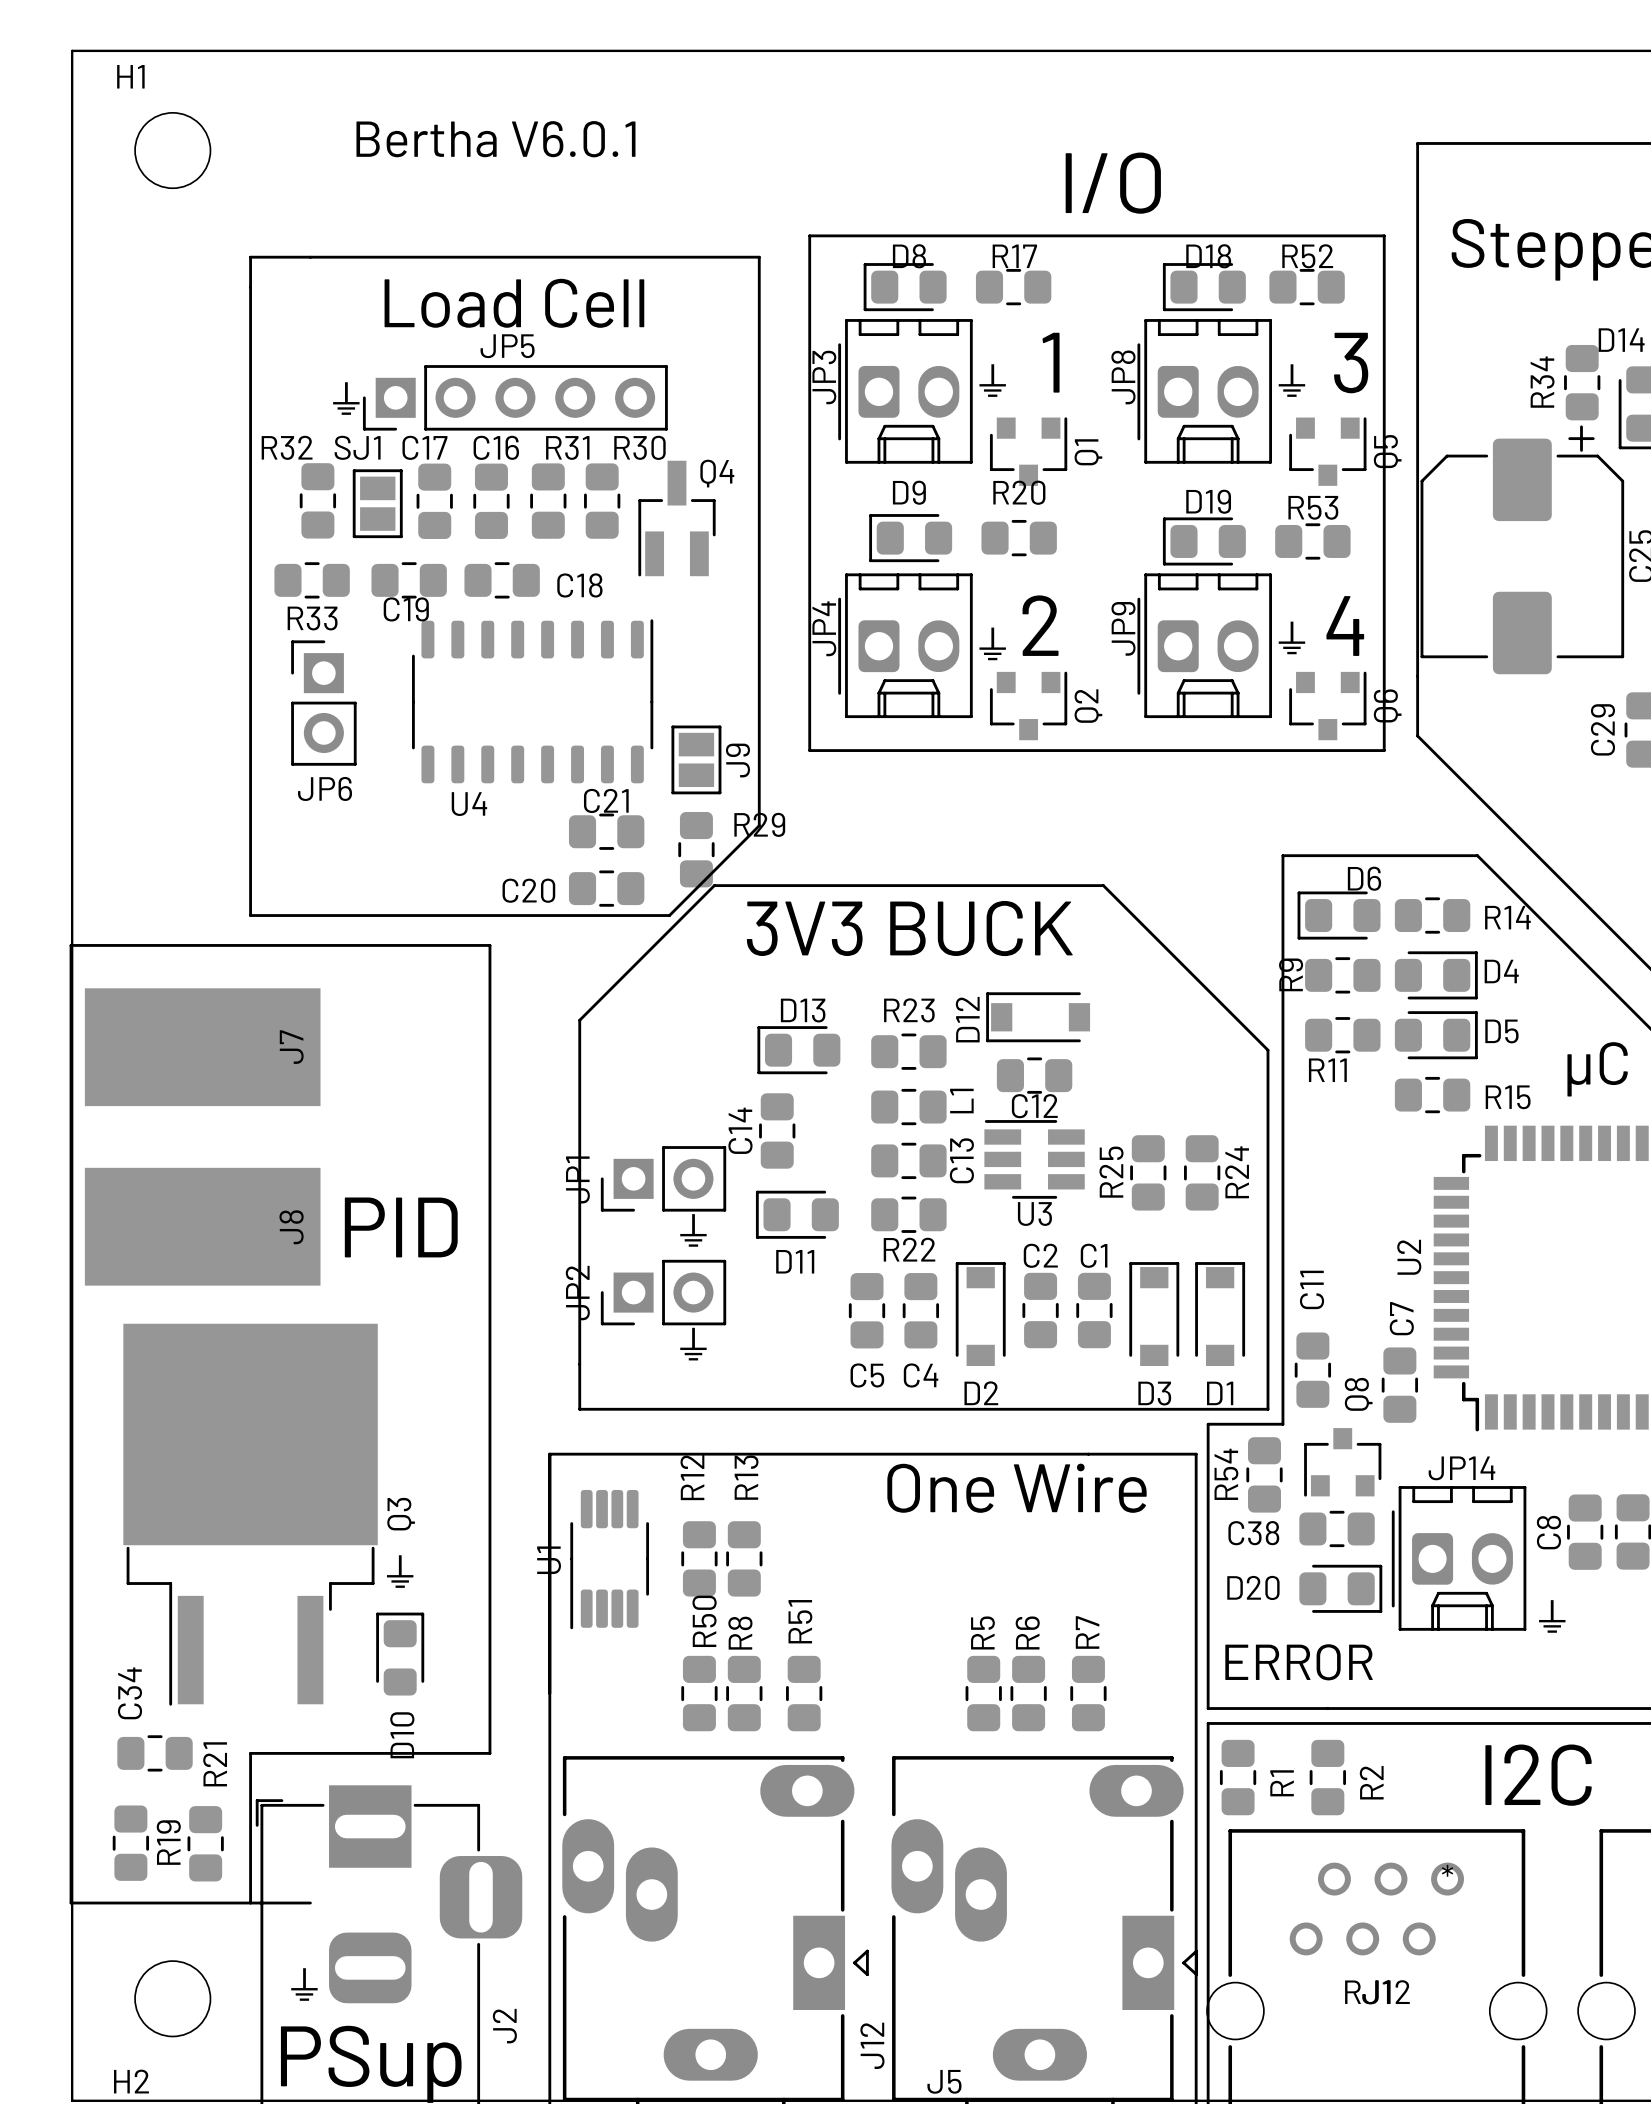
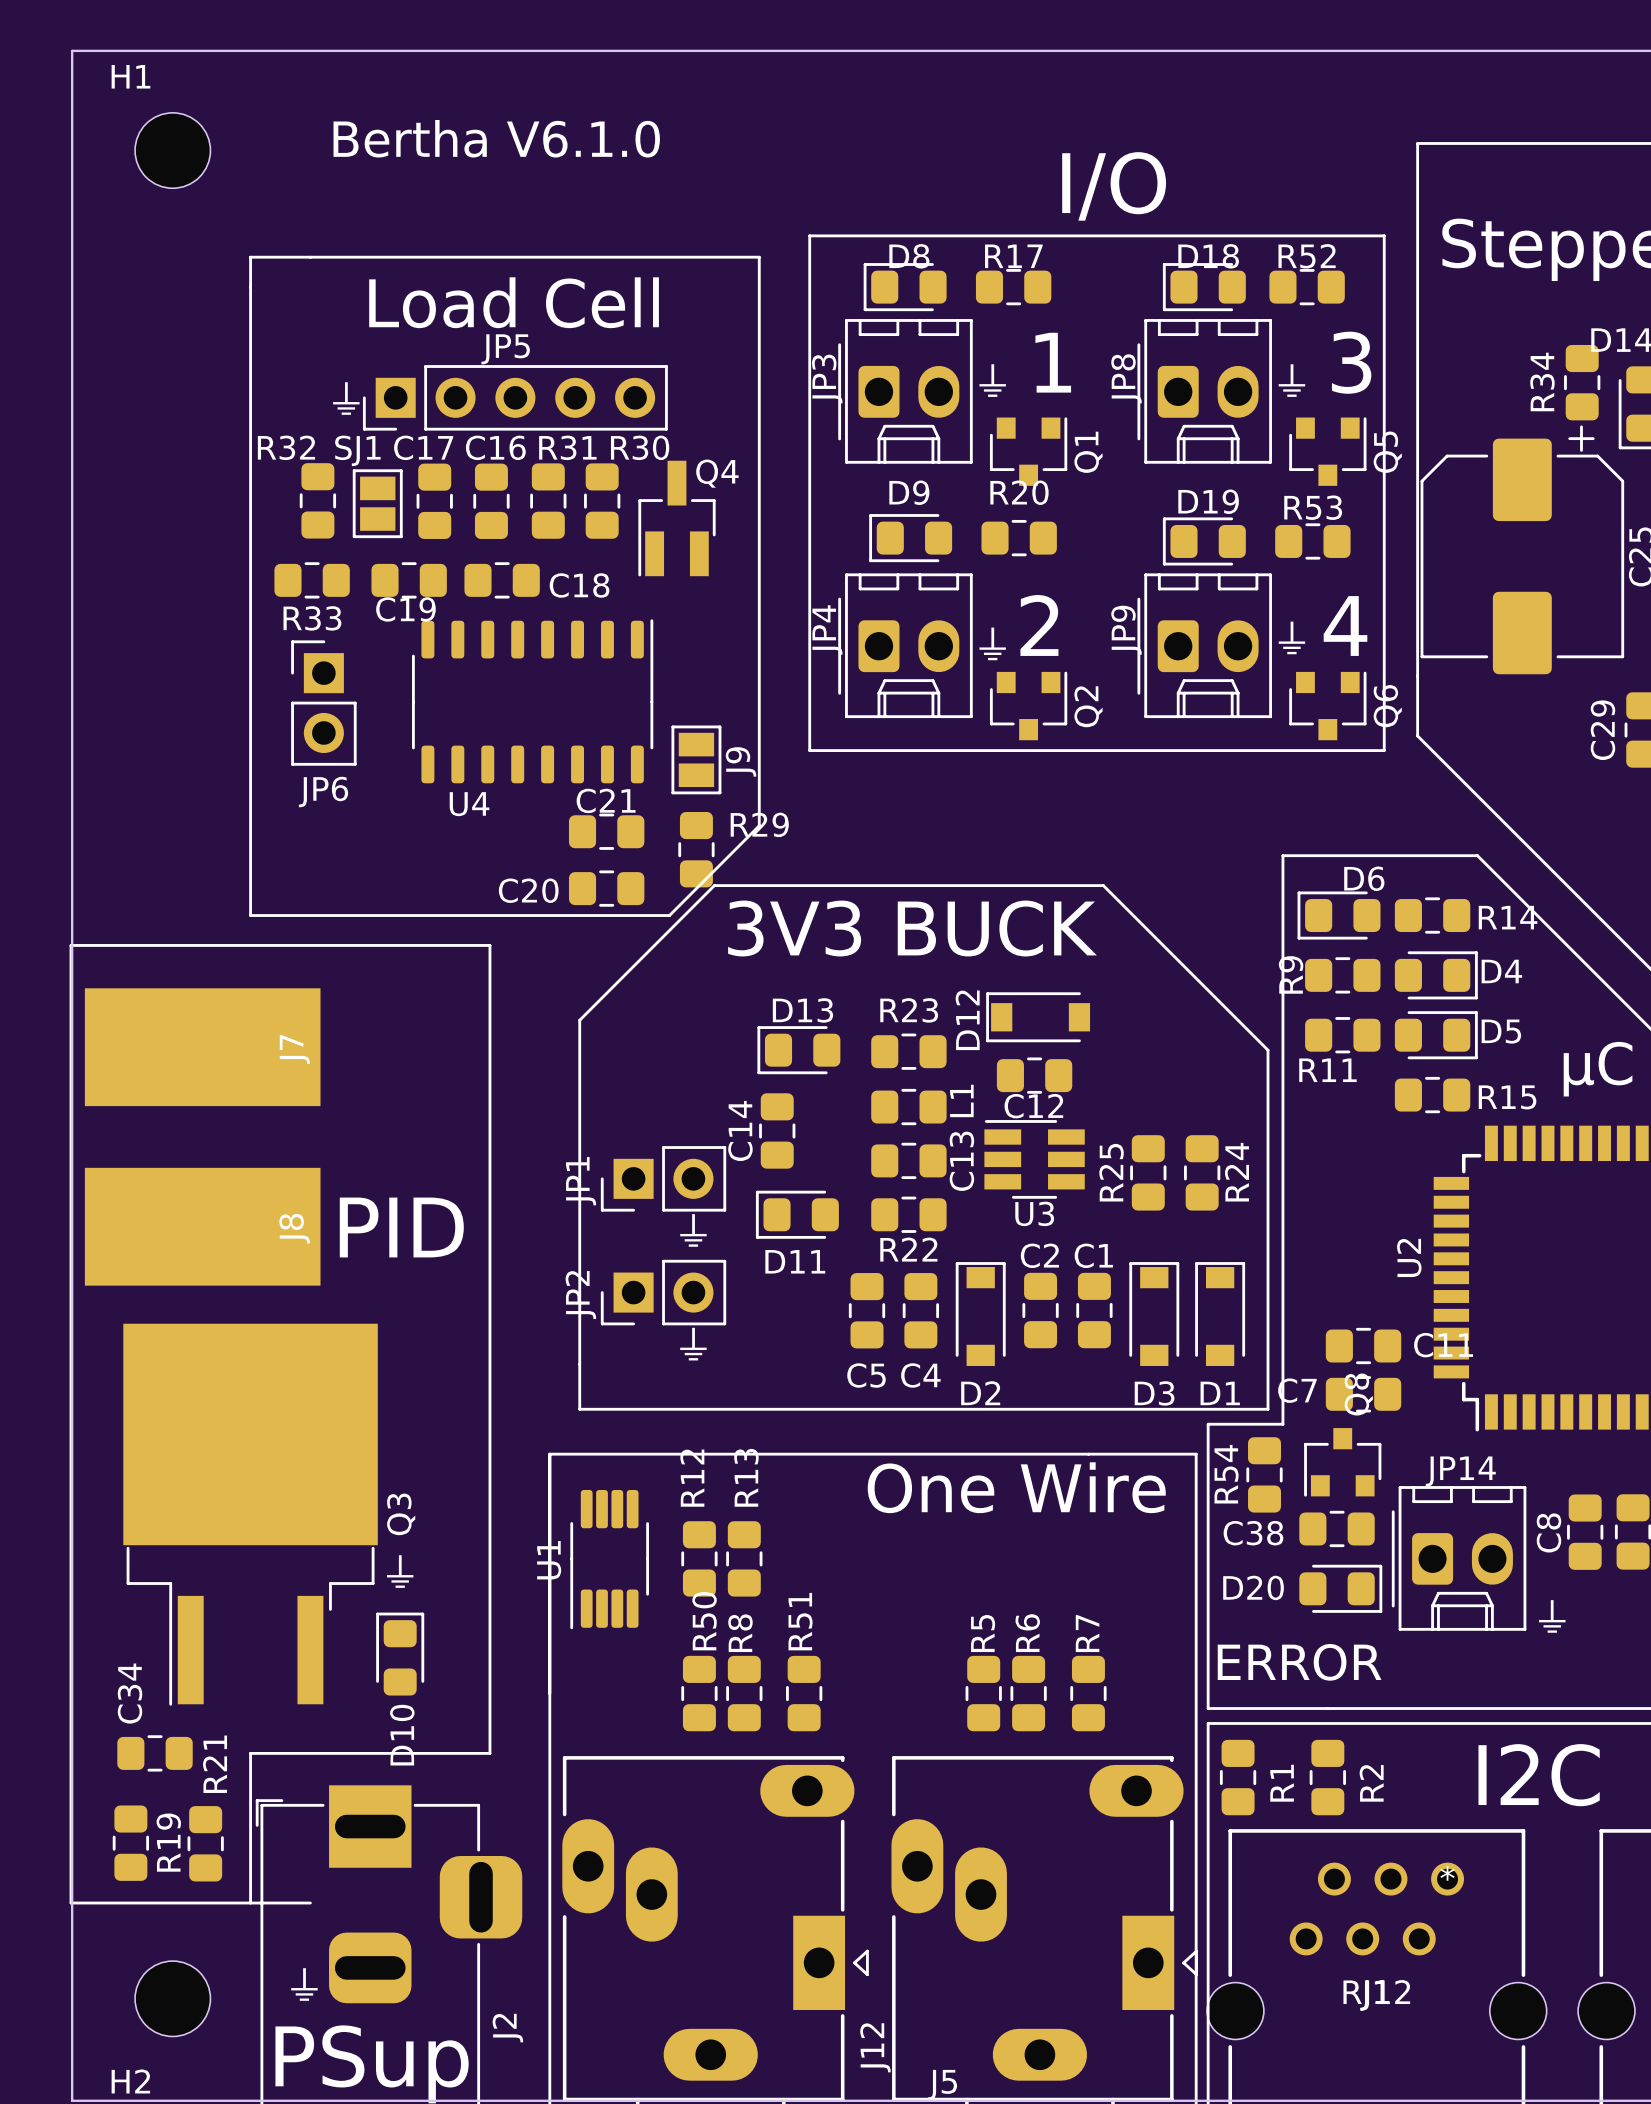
text: Bertha V6.0.1 (495, 139) -> Bertha V6.1.0 (496, 138)
C7 name position: C7 (1401, 1318) -> C7 (1297, 1390)
C11 rotation: 0° (1312, 1370) -> 90° clockwise (1363, 1346)
C11 position: (1312, 1370) -> (1363, 1346)
C7 rotation: 0° (1399, 1385) -> 90° clockwise (1363, 1394)

